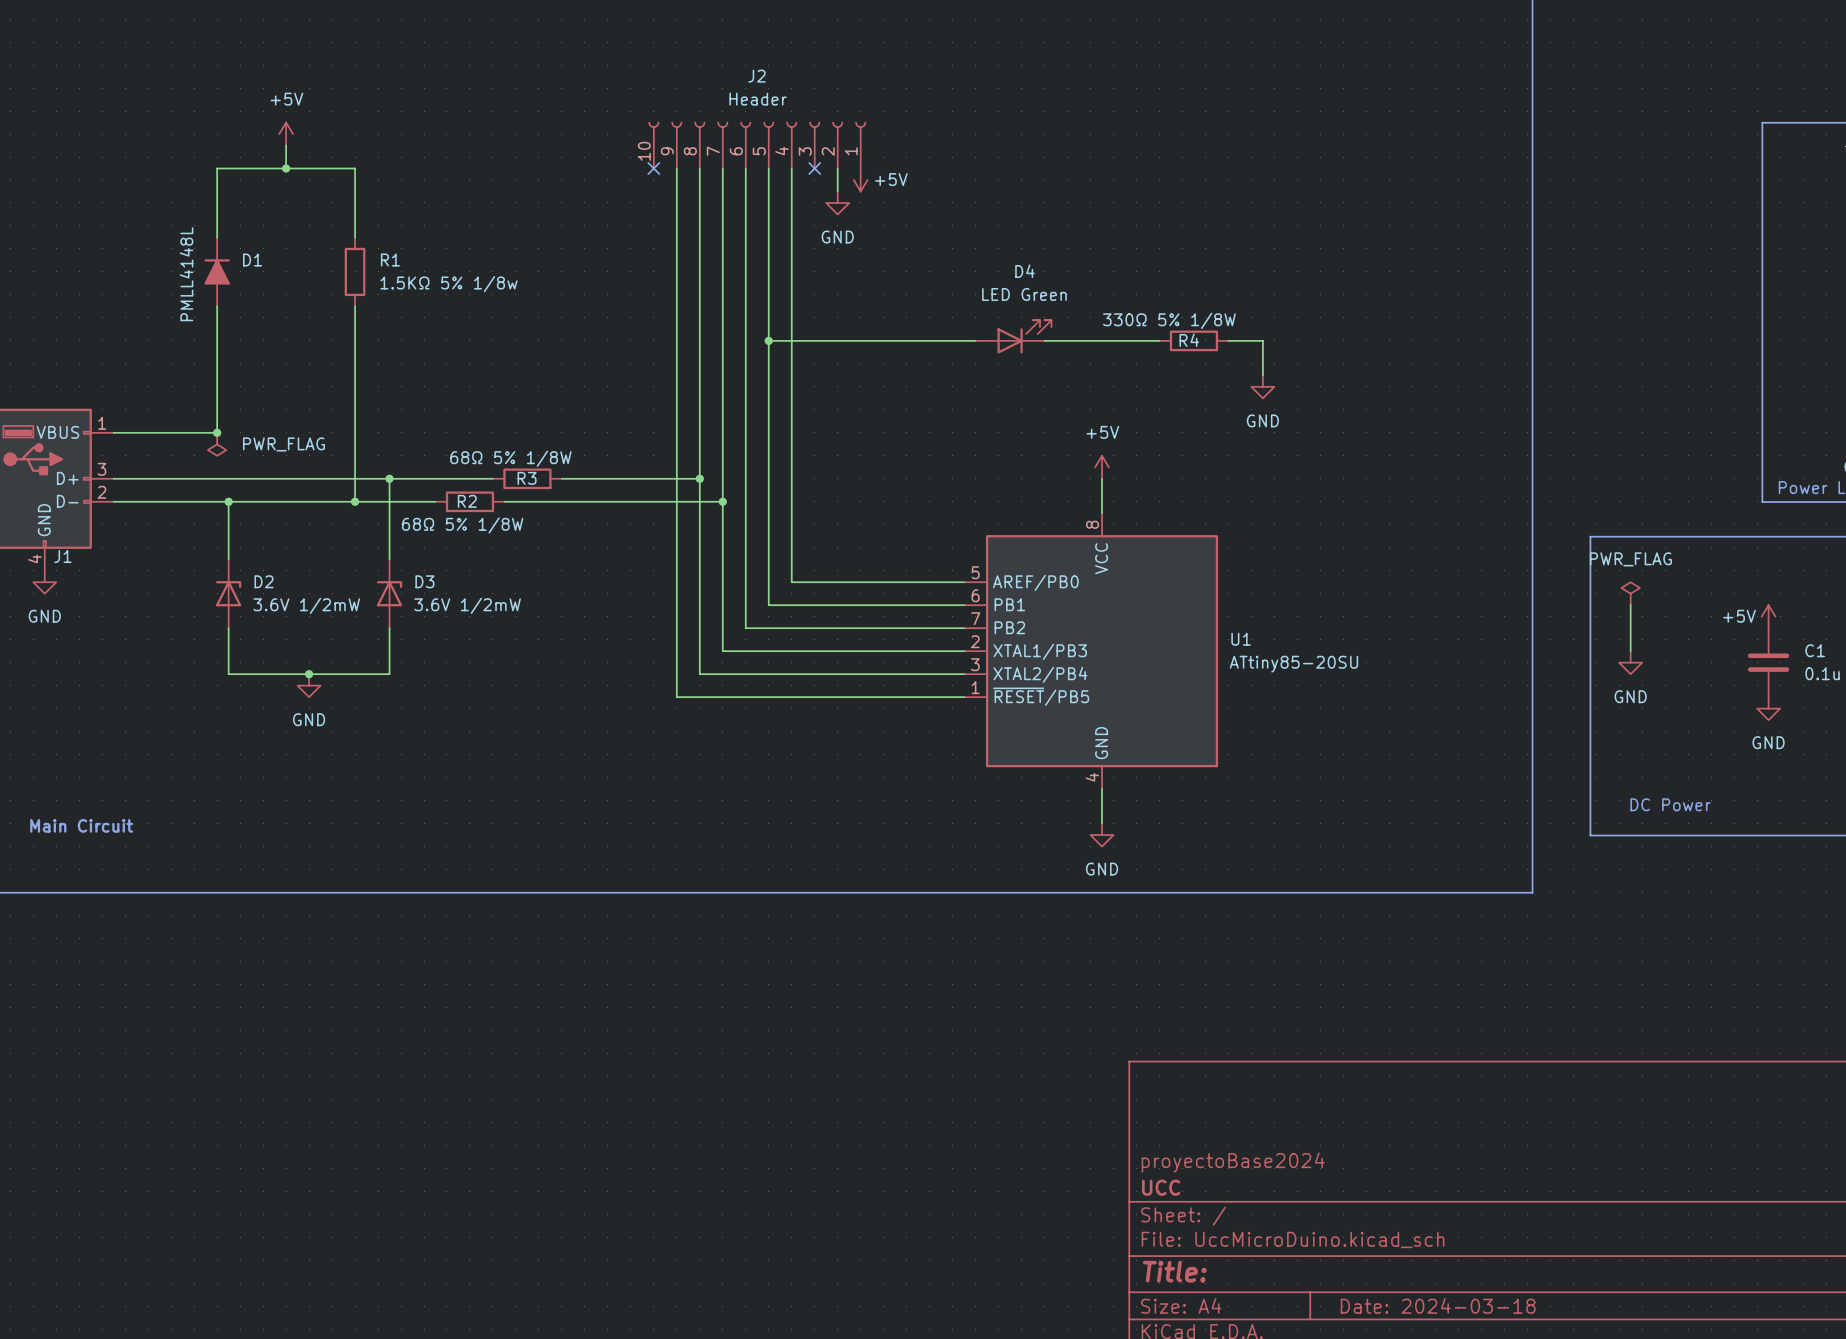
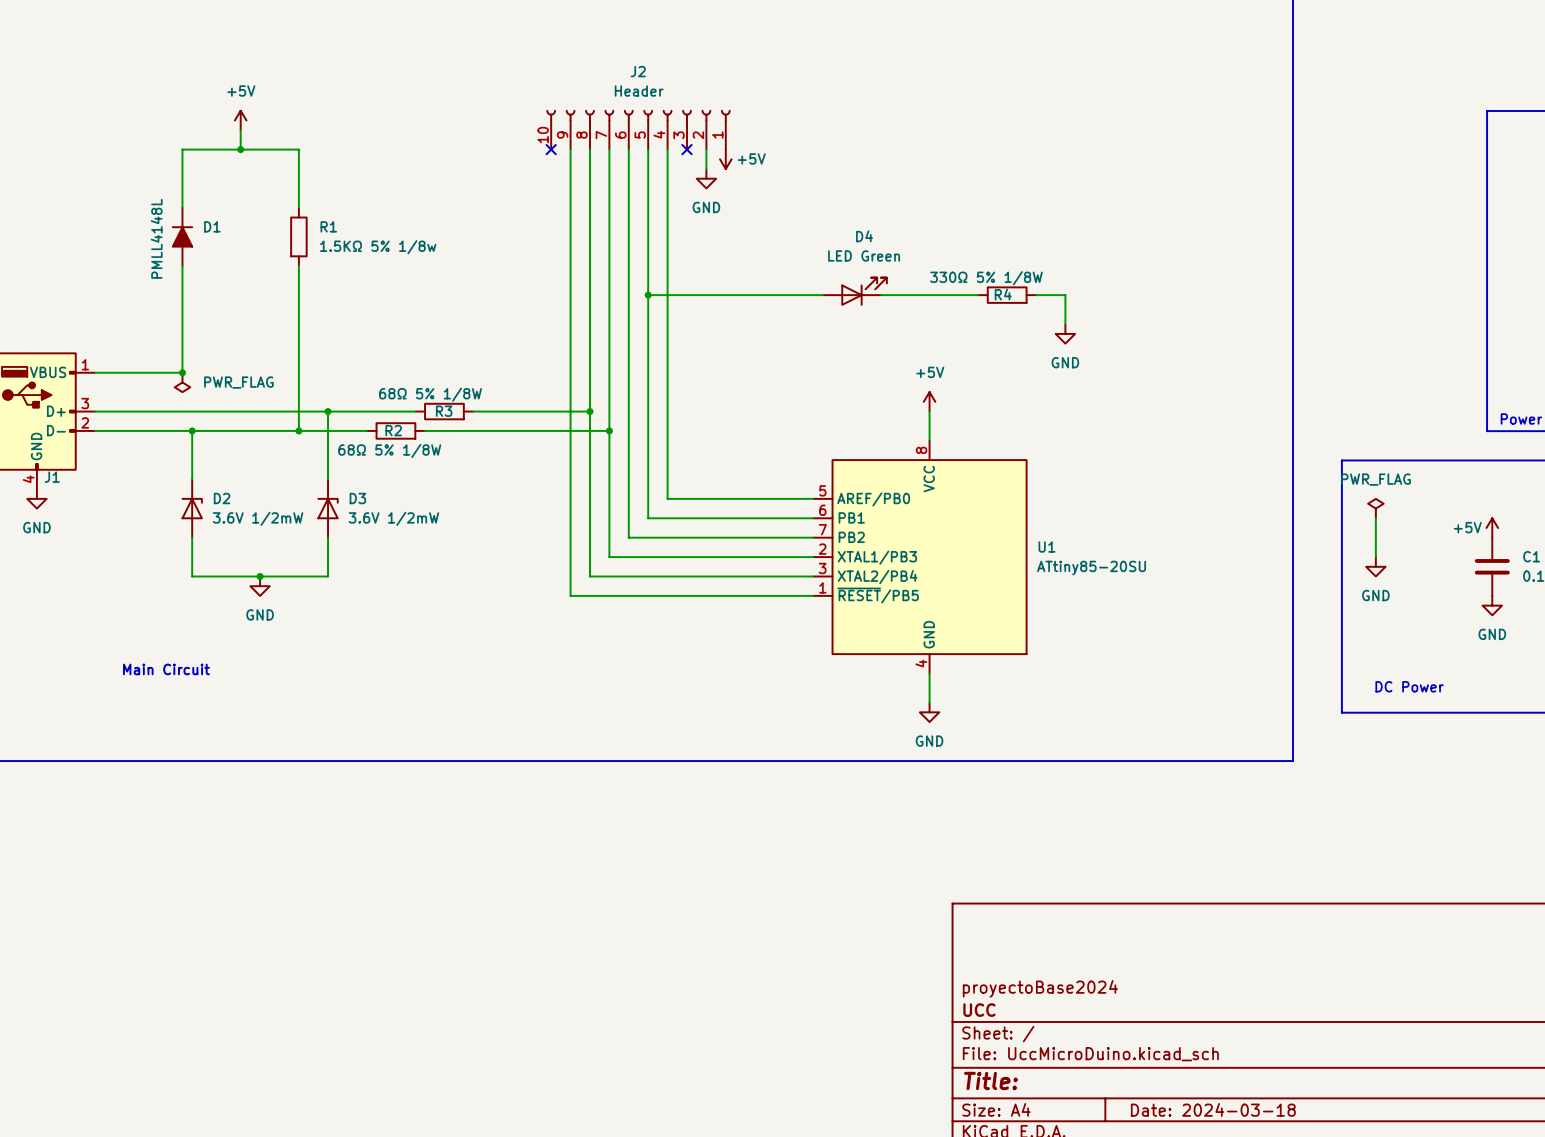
text position: Main Circuit (81, 825) -> Main Circuit (166, 669)

